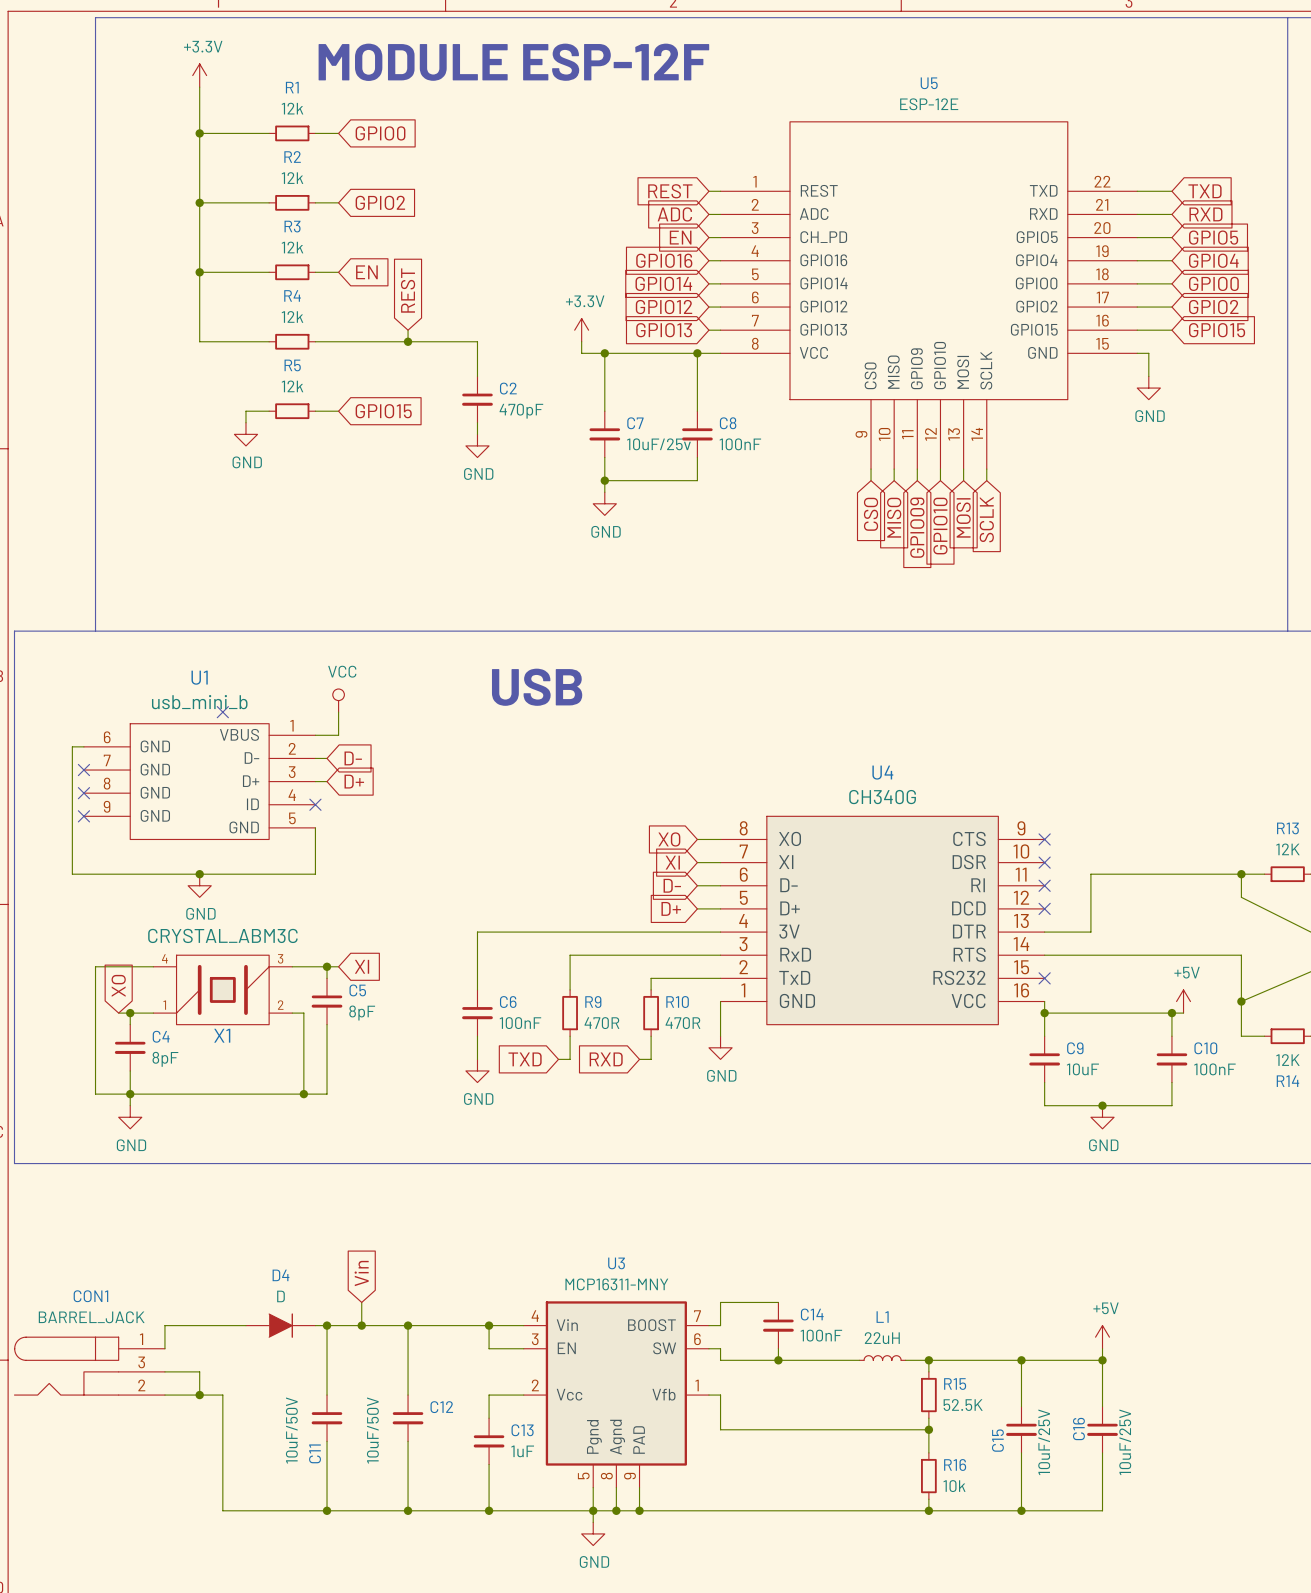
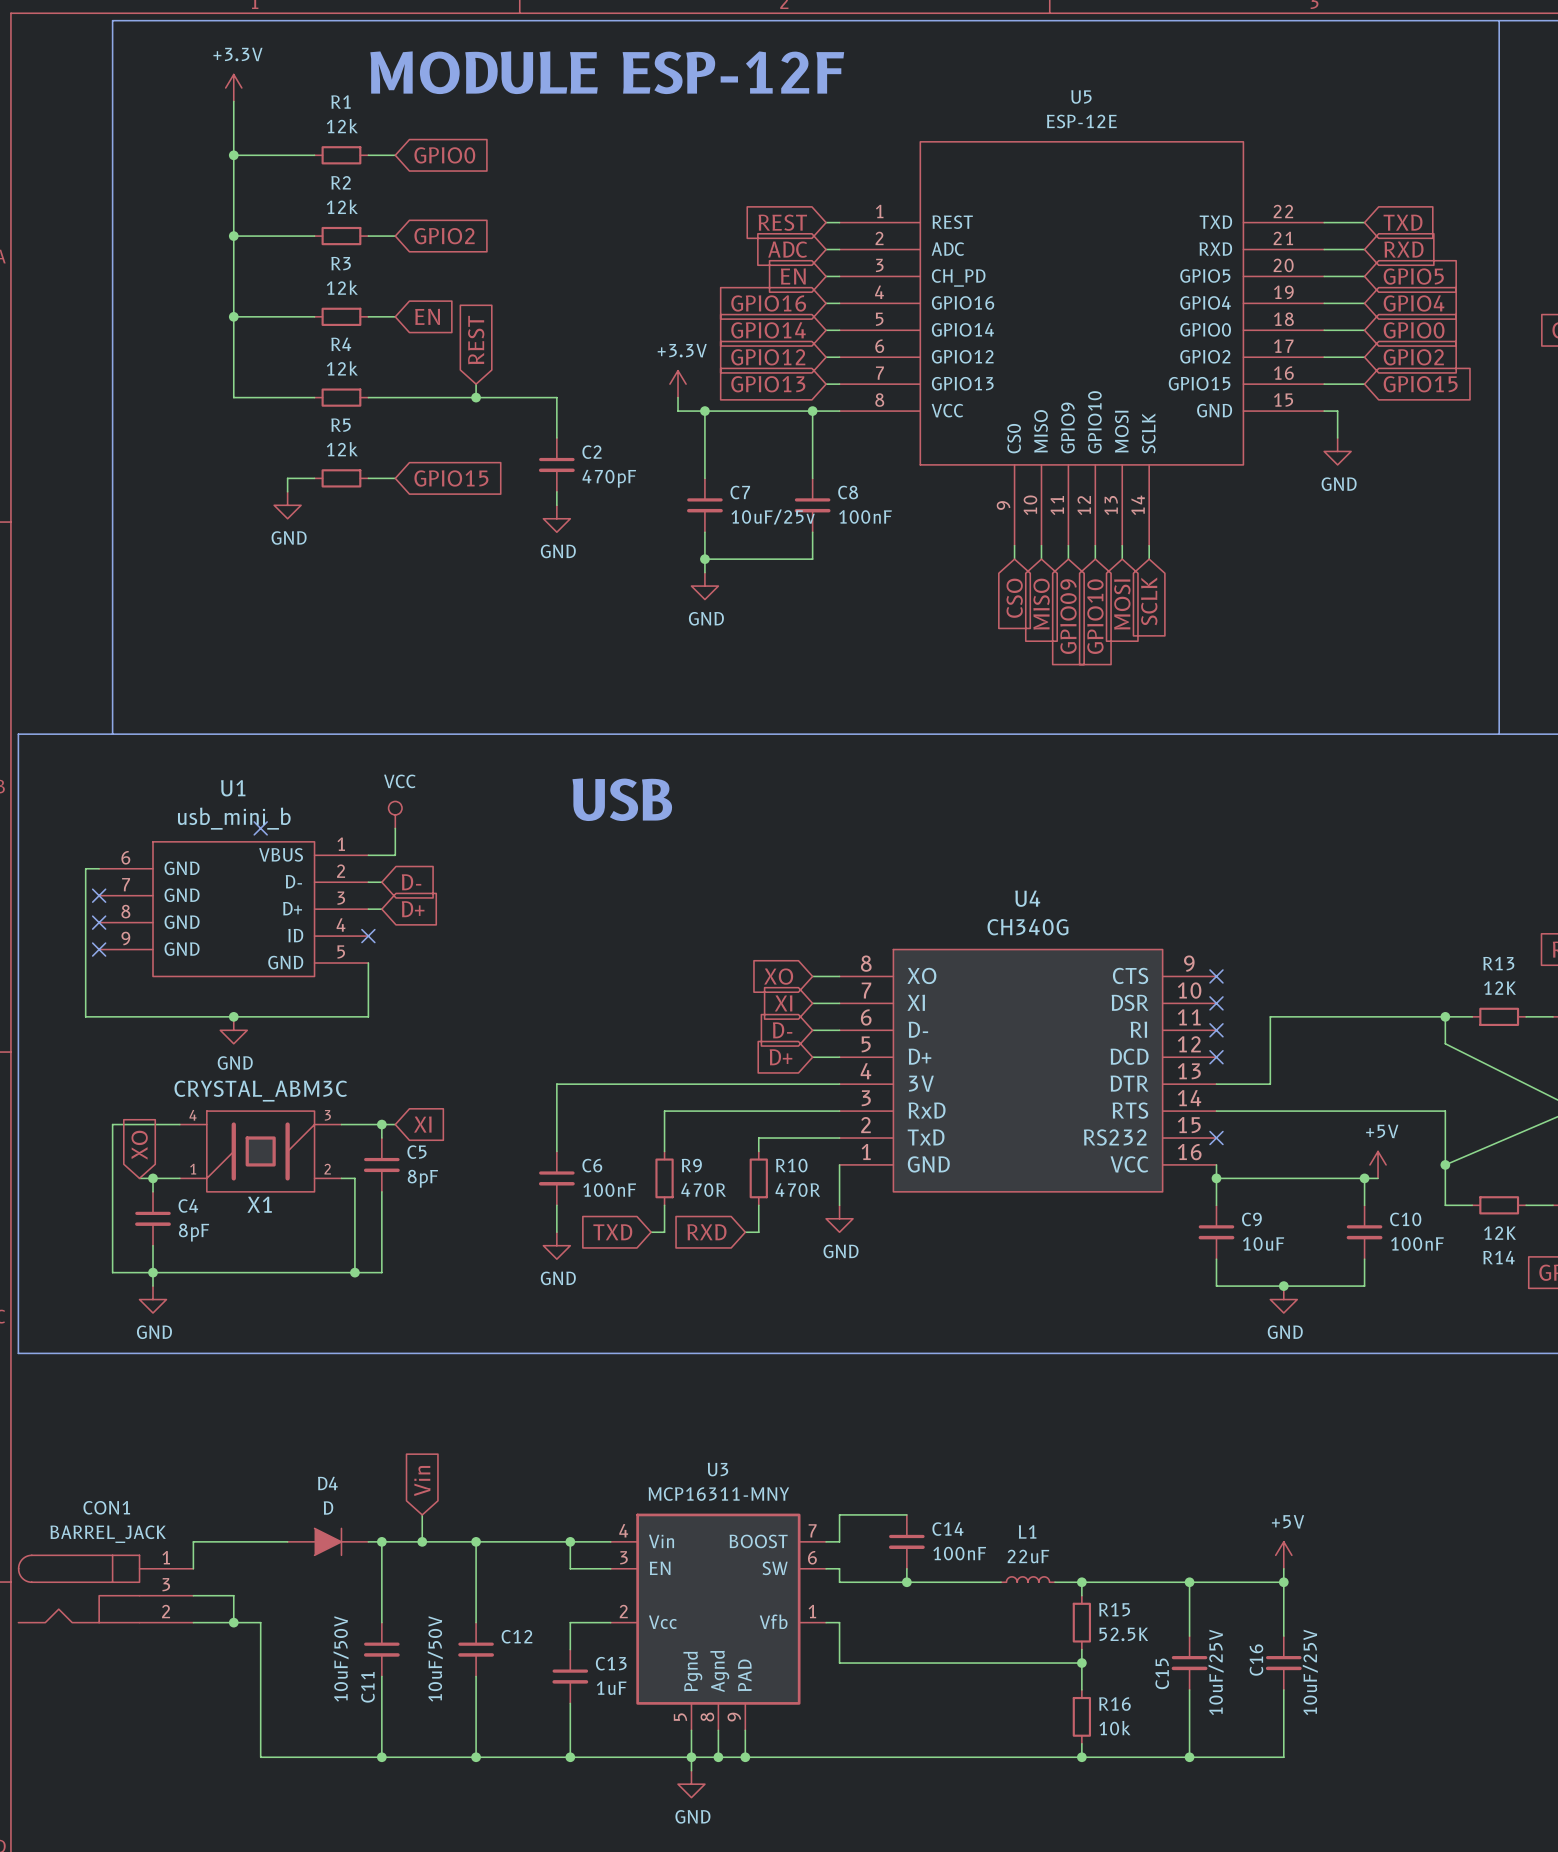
L1 value: 22uH (882, 1338) -> 22uF (1028, 1556)

